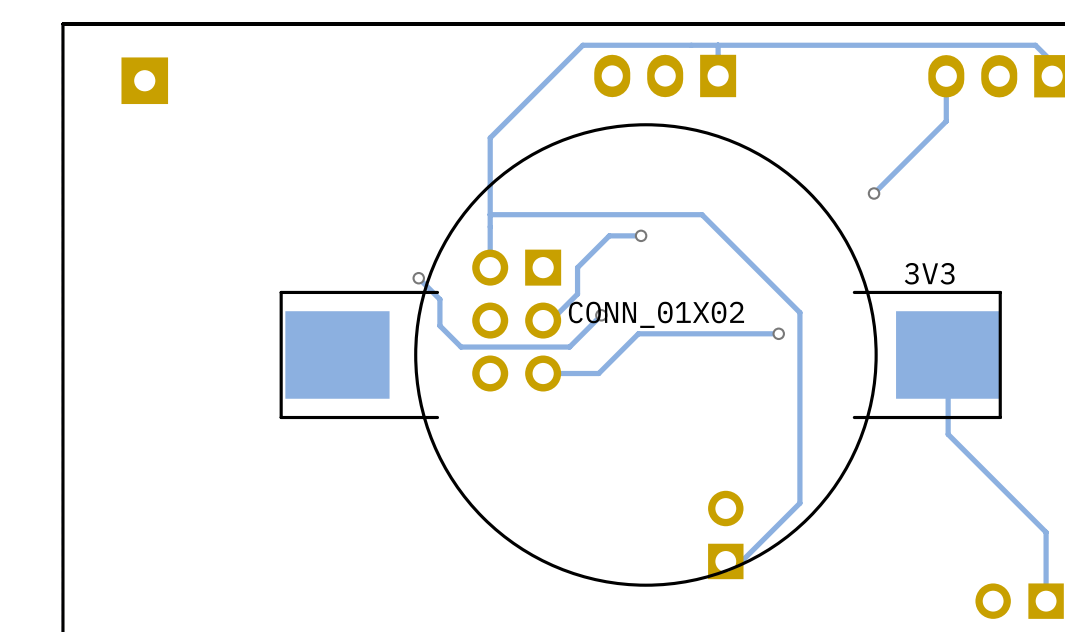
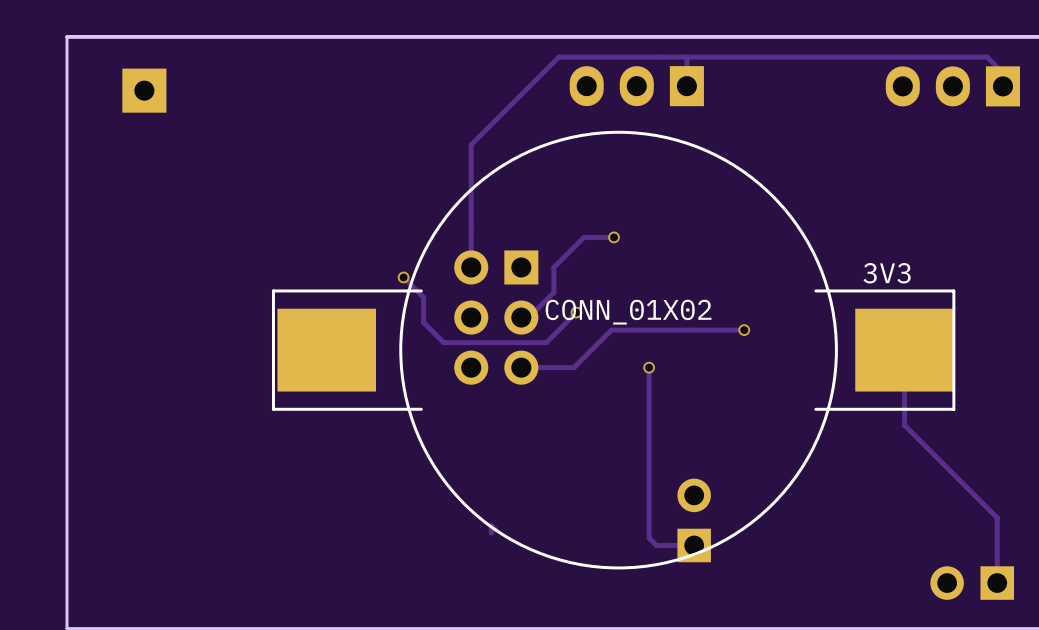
track: (946, 76) (946, 121) (874, 193) -> none
via: (874, 193) -> none
track: (490, 214) (701, 214) (799, 312) (799, 503) (741, 561) (725, 561) -> (649, 367) (649, 537) (656, 545) (694, 545)
via: none -> (649, 367)
track: none -> (496, 530) (491, 525) (491, 532)

